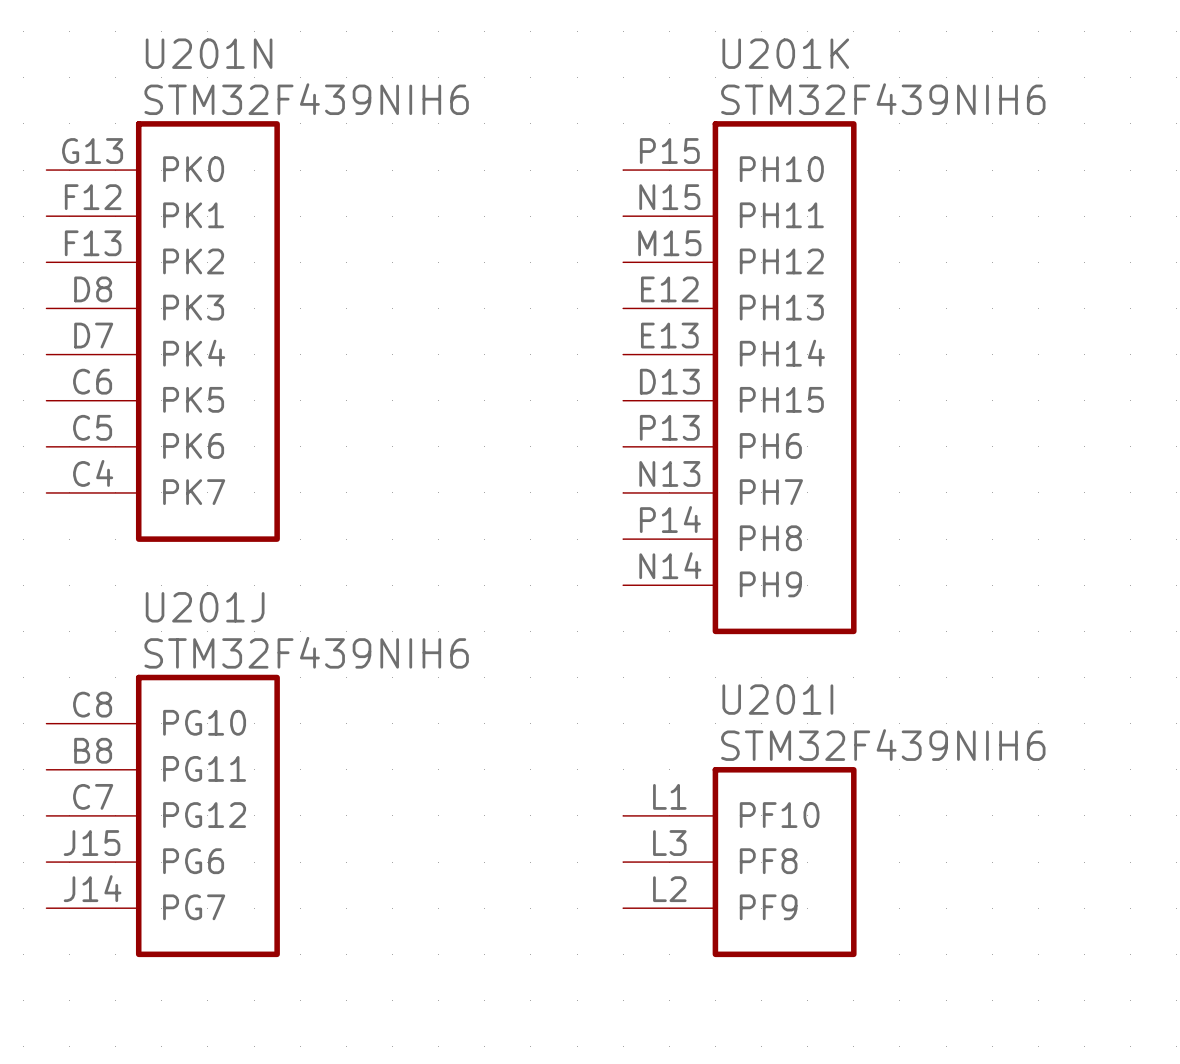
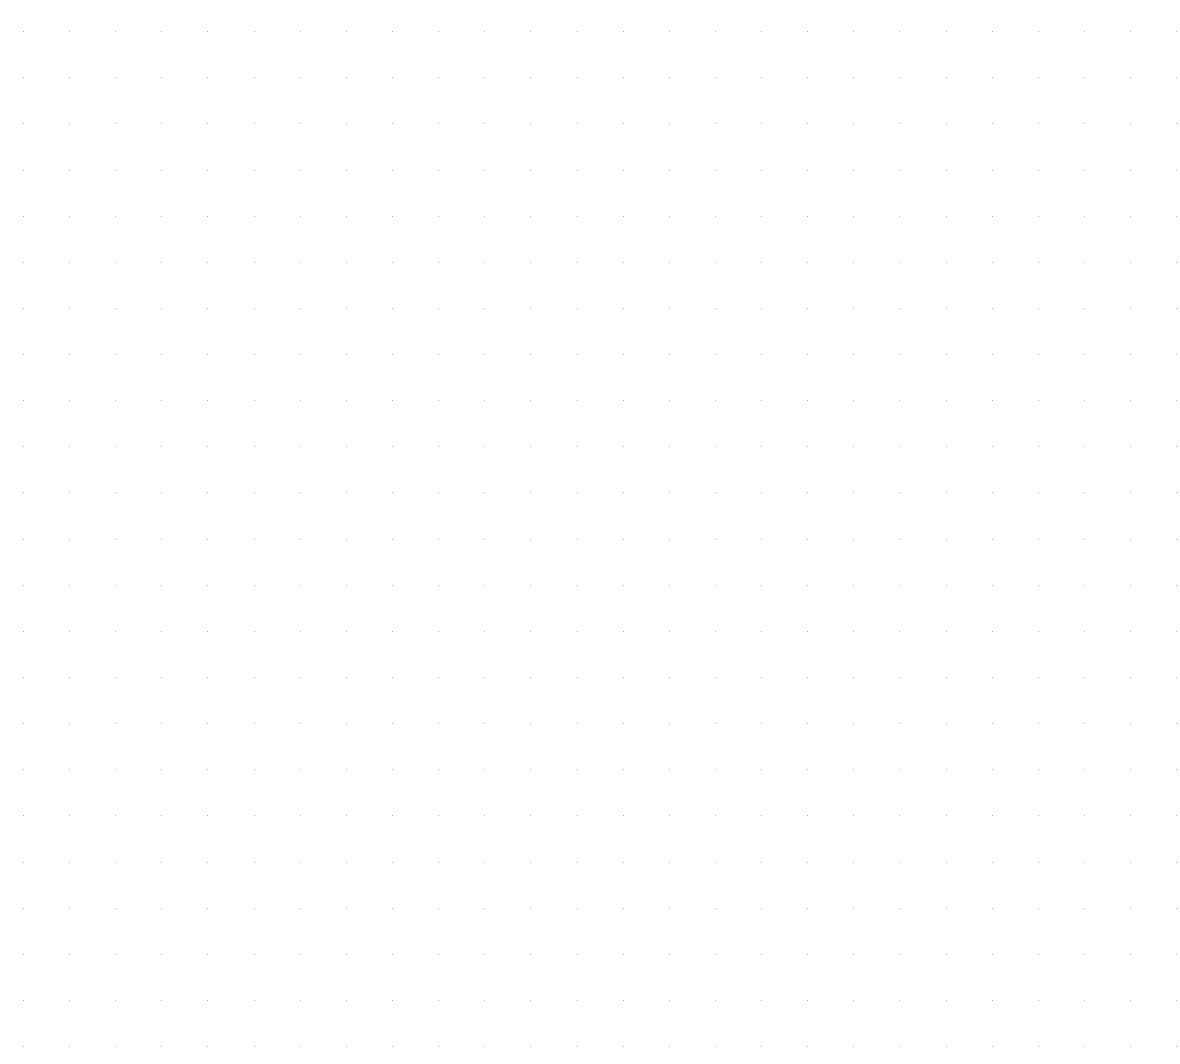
U201N: STM32F439NIH6 (163, 331) -> none
U201K: STM32F439NIH6 (739, 377) -> none
U201J: STM32F439NIH6 (163, 815) -> none
U201I: STM32F439NIH6 (739, 862) -> none

